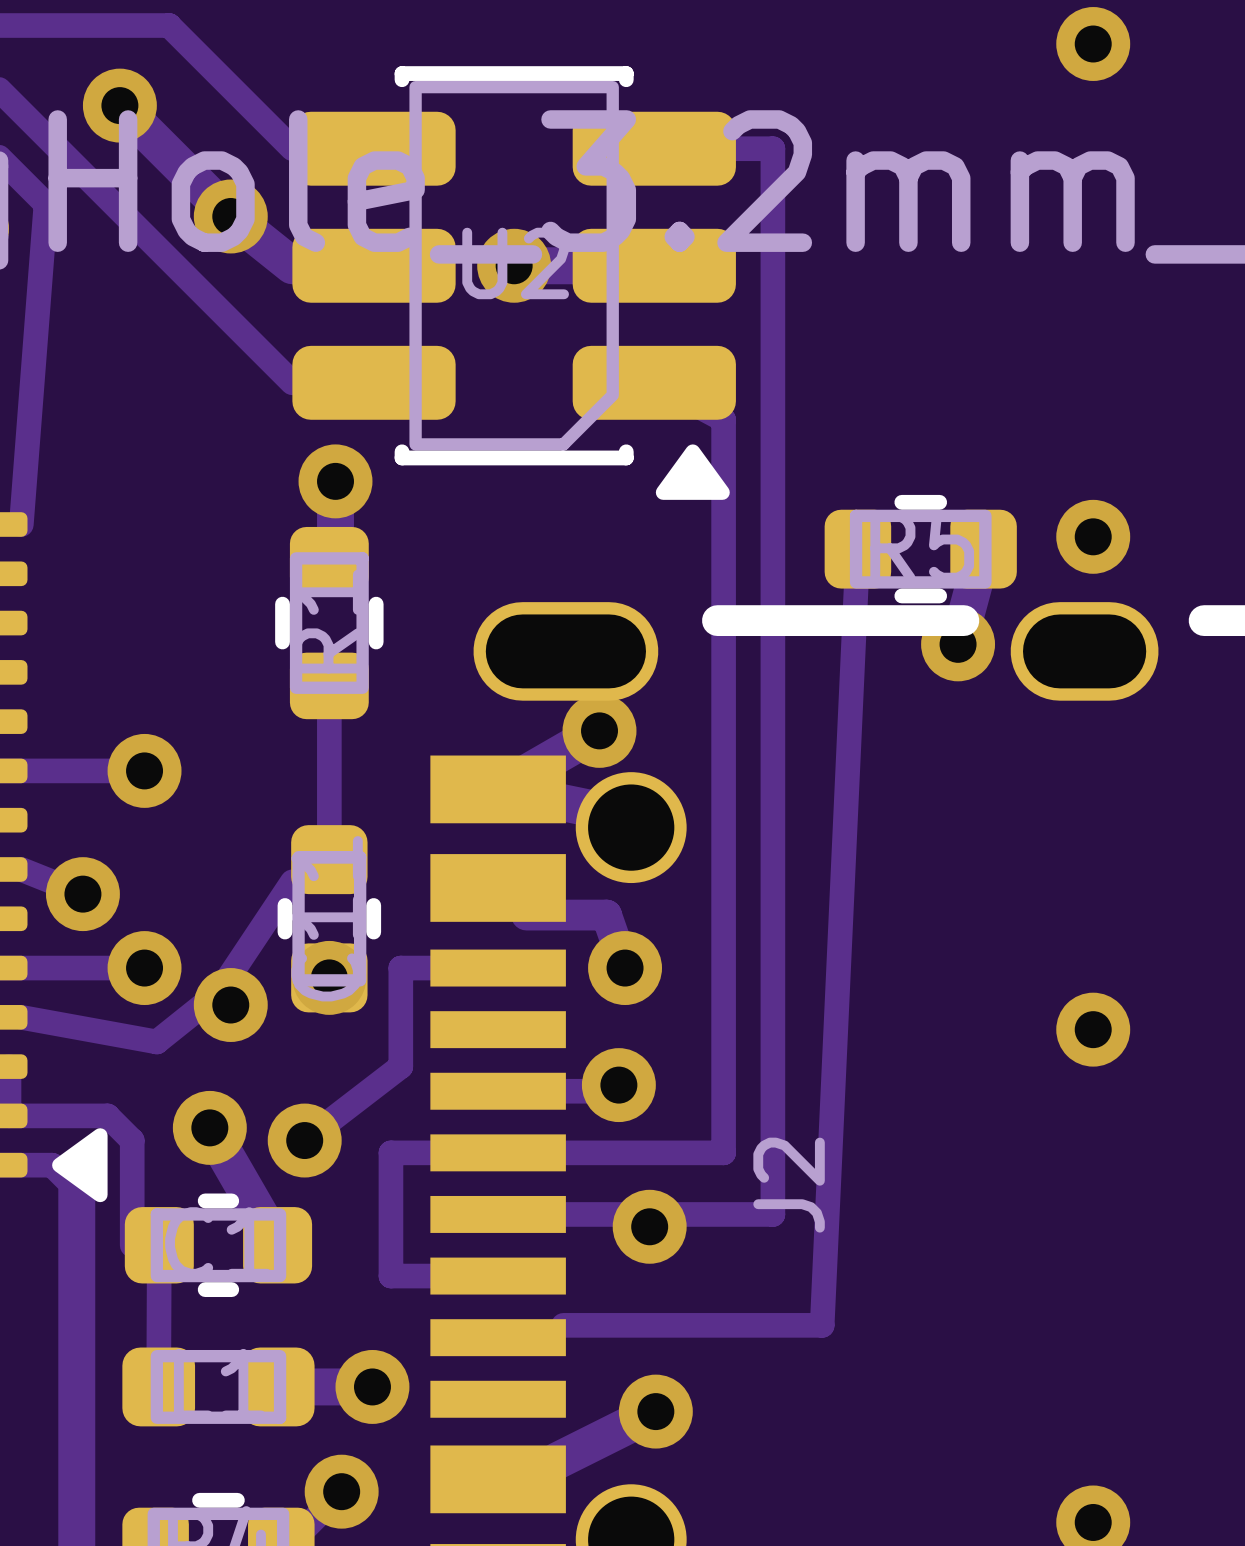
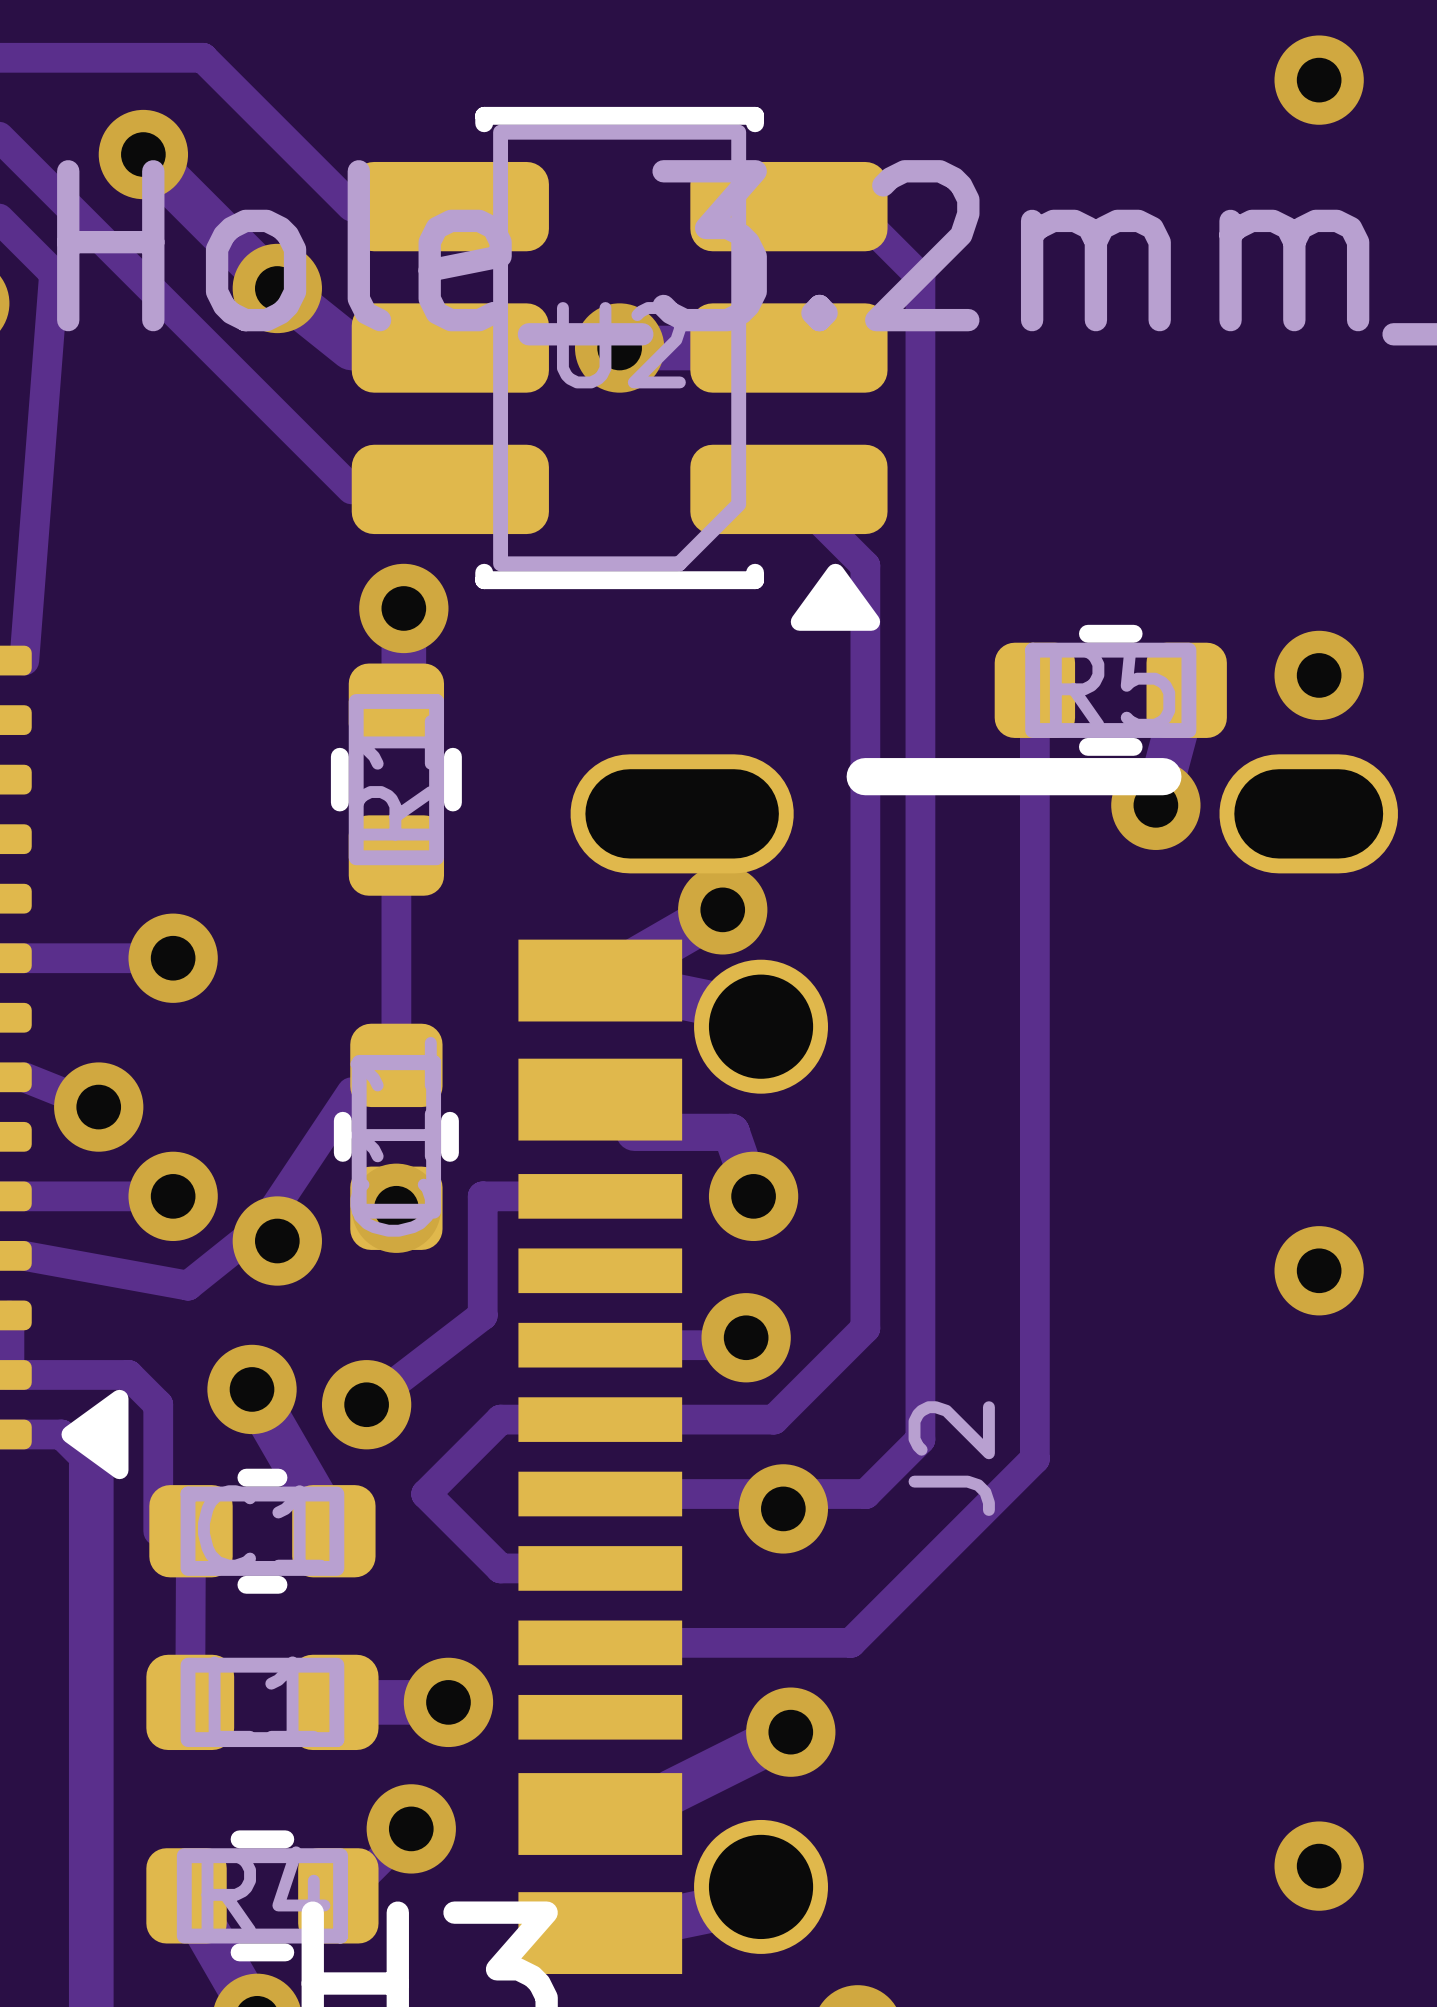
track: (654, 148) (772, 148) (772, 1214) (717, 1214) -> (788, 206) (788, 219) (798, 228) (872, 228) (920, 276) (920, 1439) (865, 1494)
track: (654, 382) (723, 419) (723, 1152) (641, 1152) -> (788, 489) (865, 565) (865, 1328) (773, 1419)
track: (857, 549) (822, 1325) (563, 1325) -> (1034, 690) (1034, 1458) (850, 1642) (600, 1642)
track: (415, 1152) (390, 1152) (390, 1276) (415, 1276) -> (500, 1419) (426, 1494) (500, 1568)

